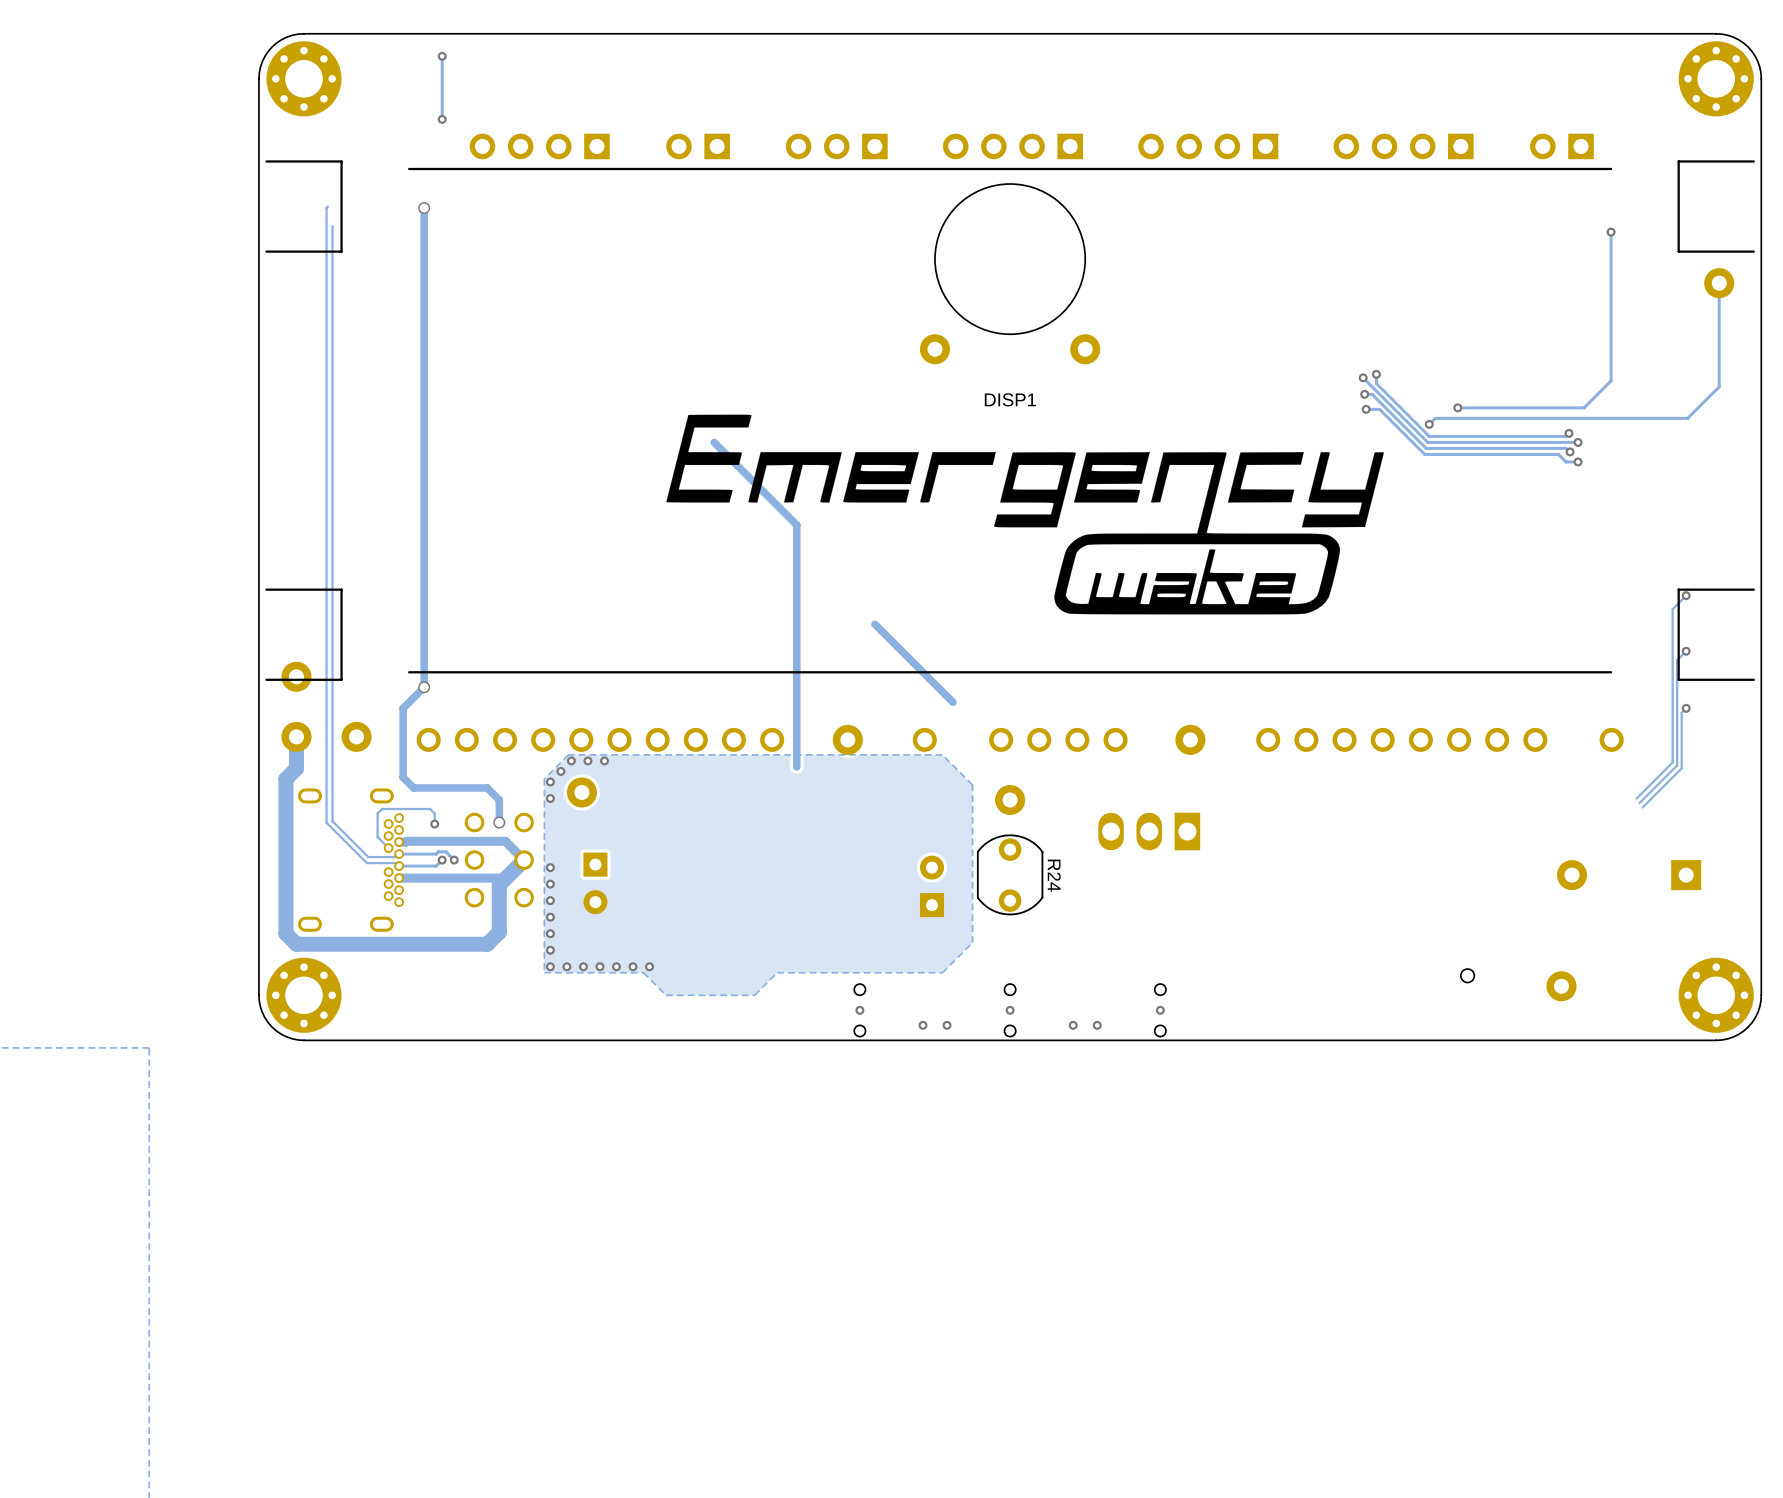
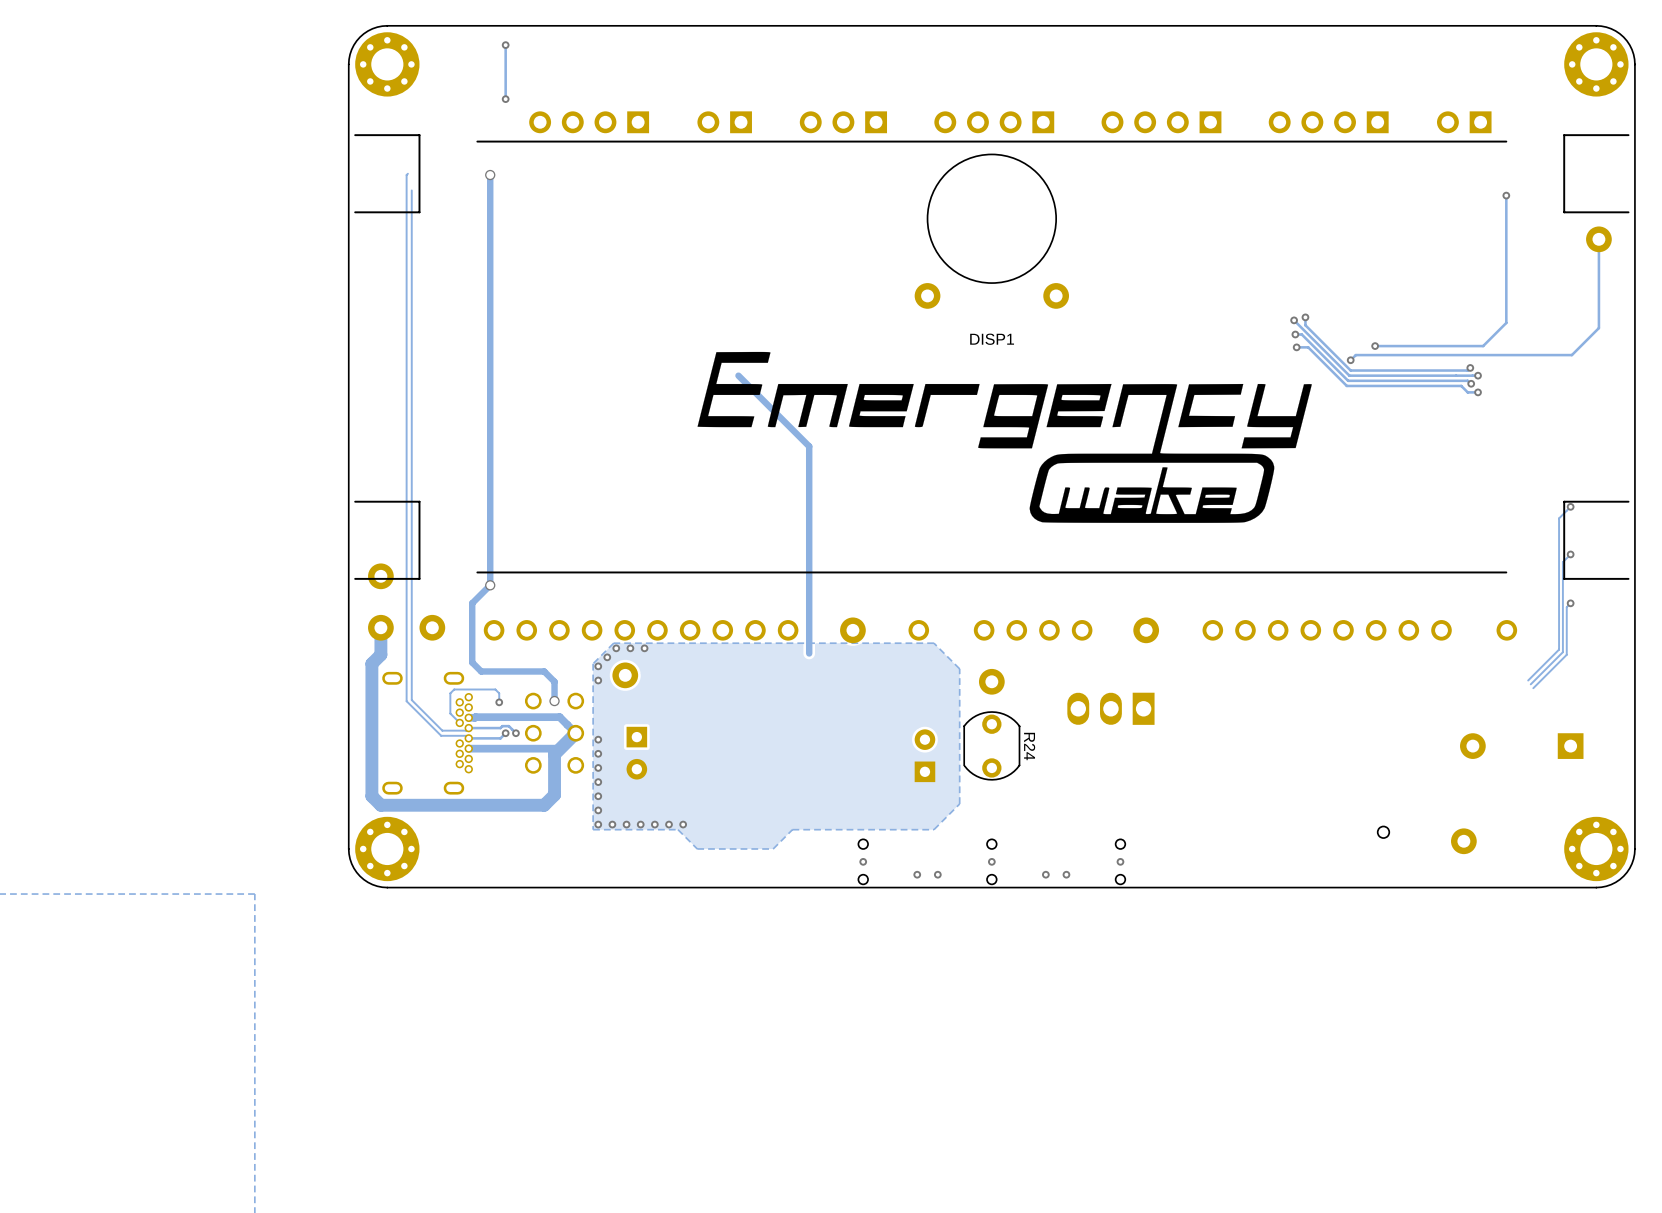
track: (874, 624) (953, 702) -> none

